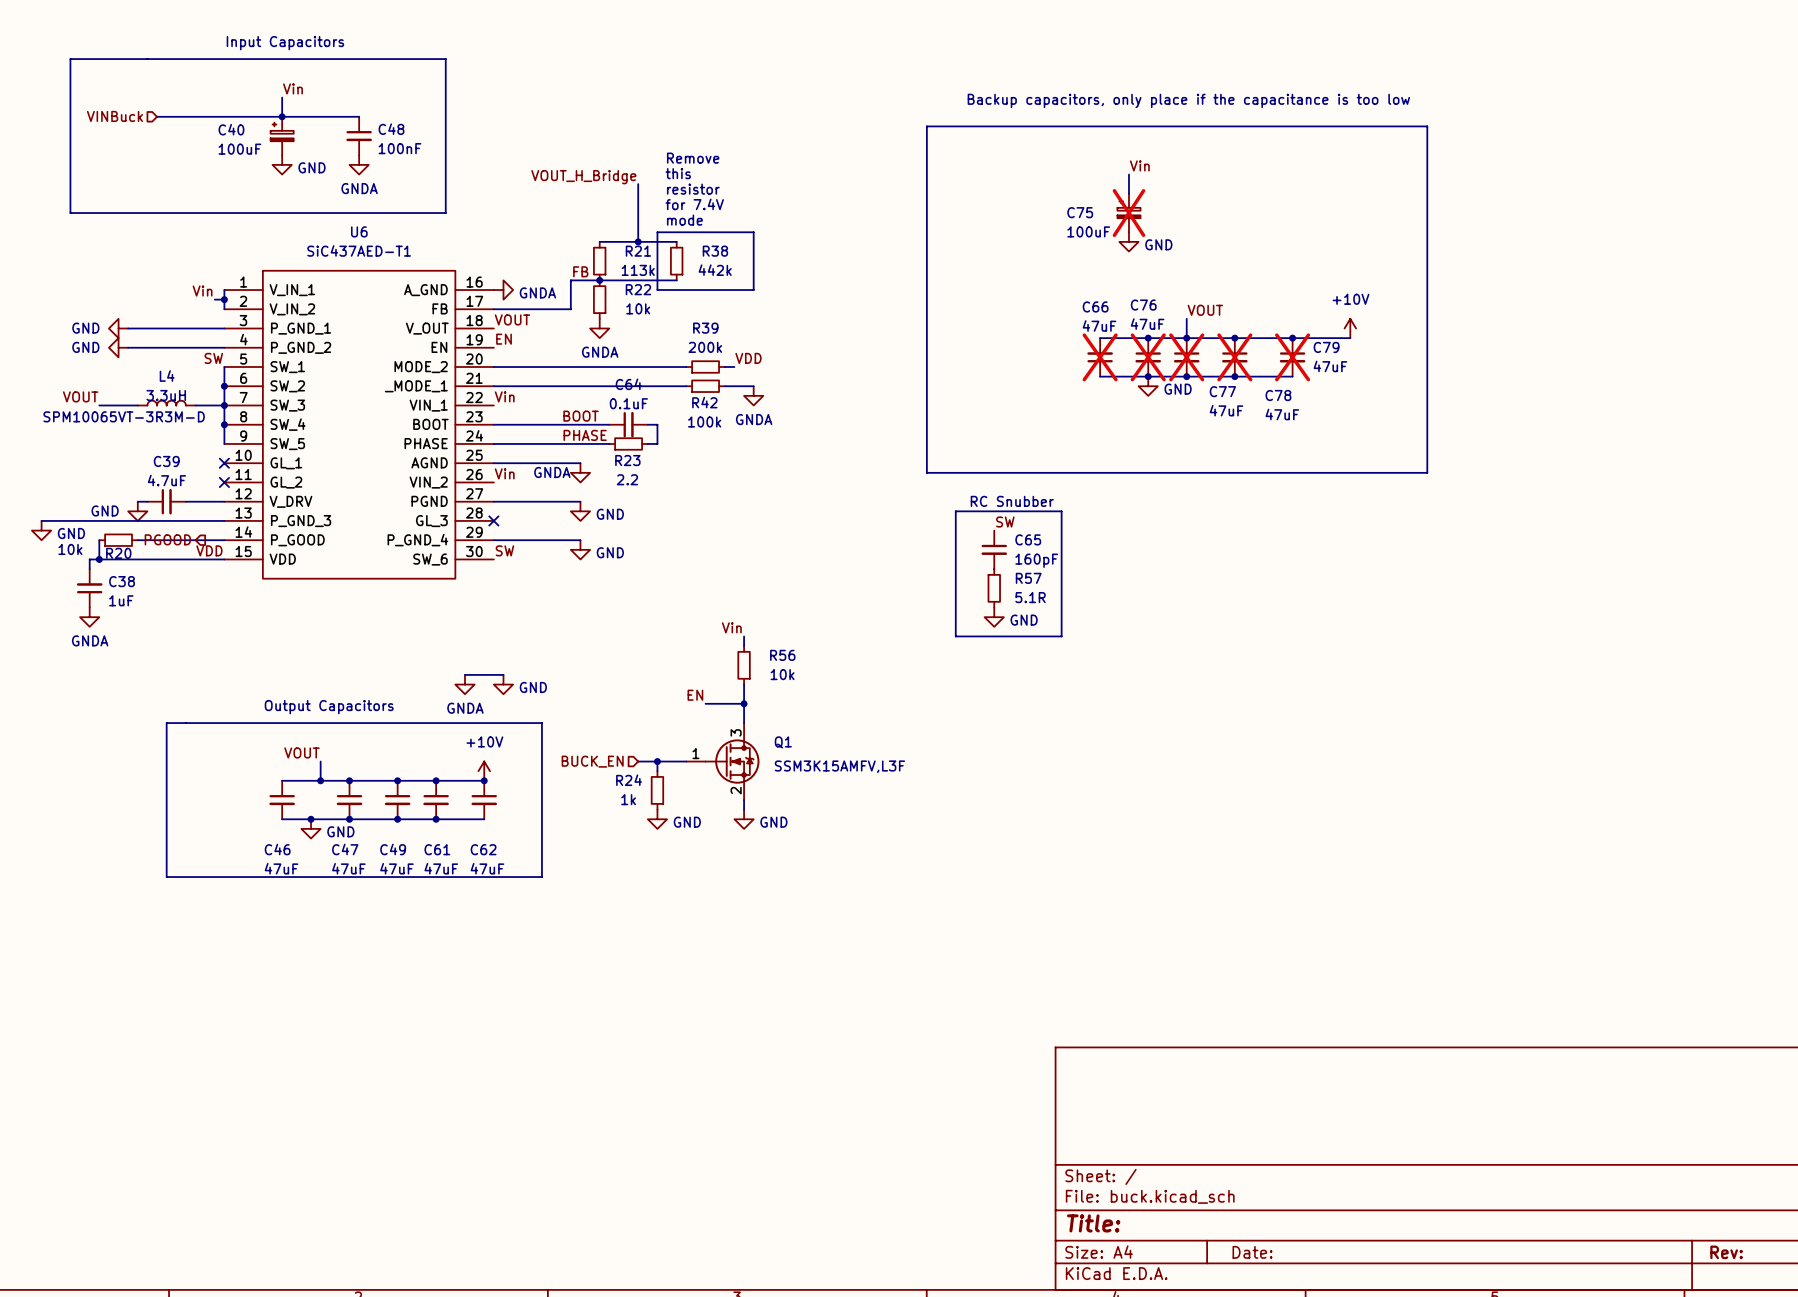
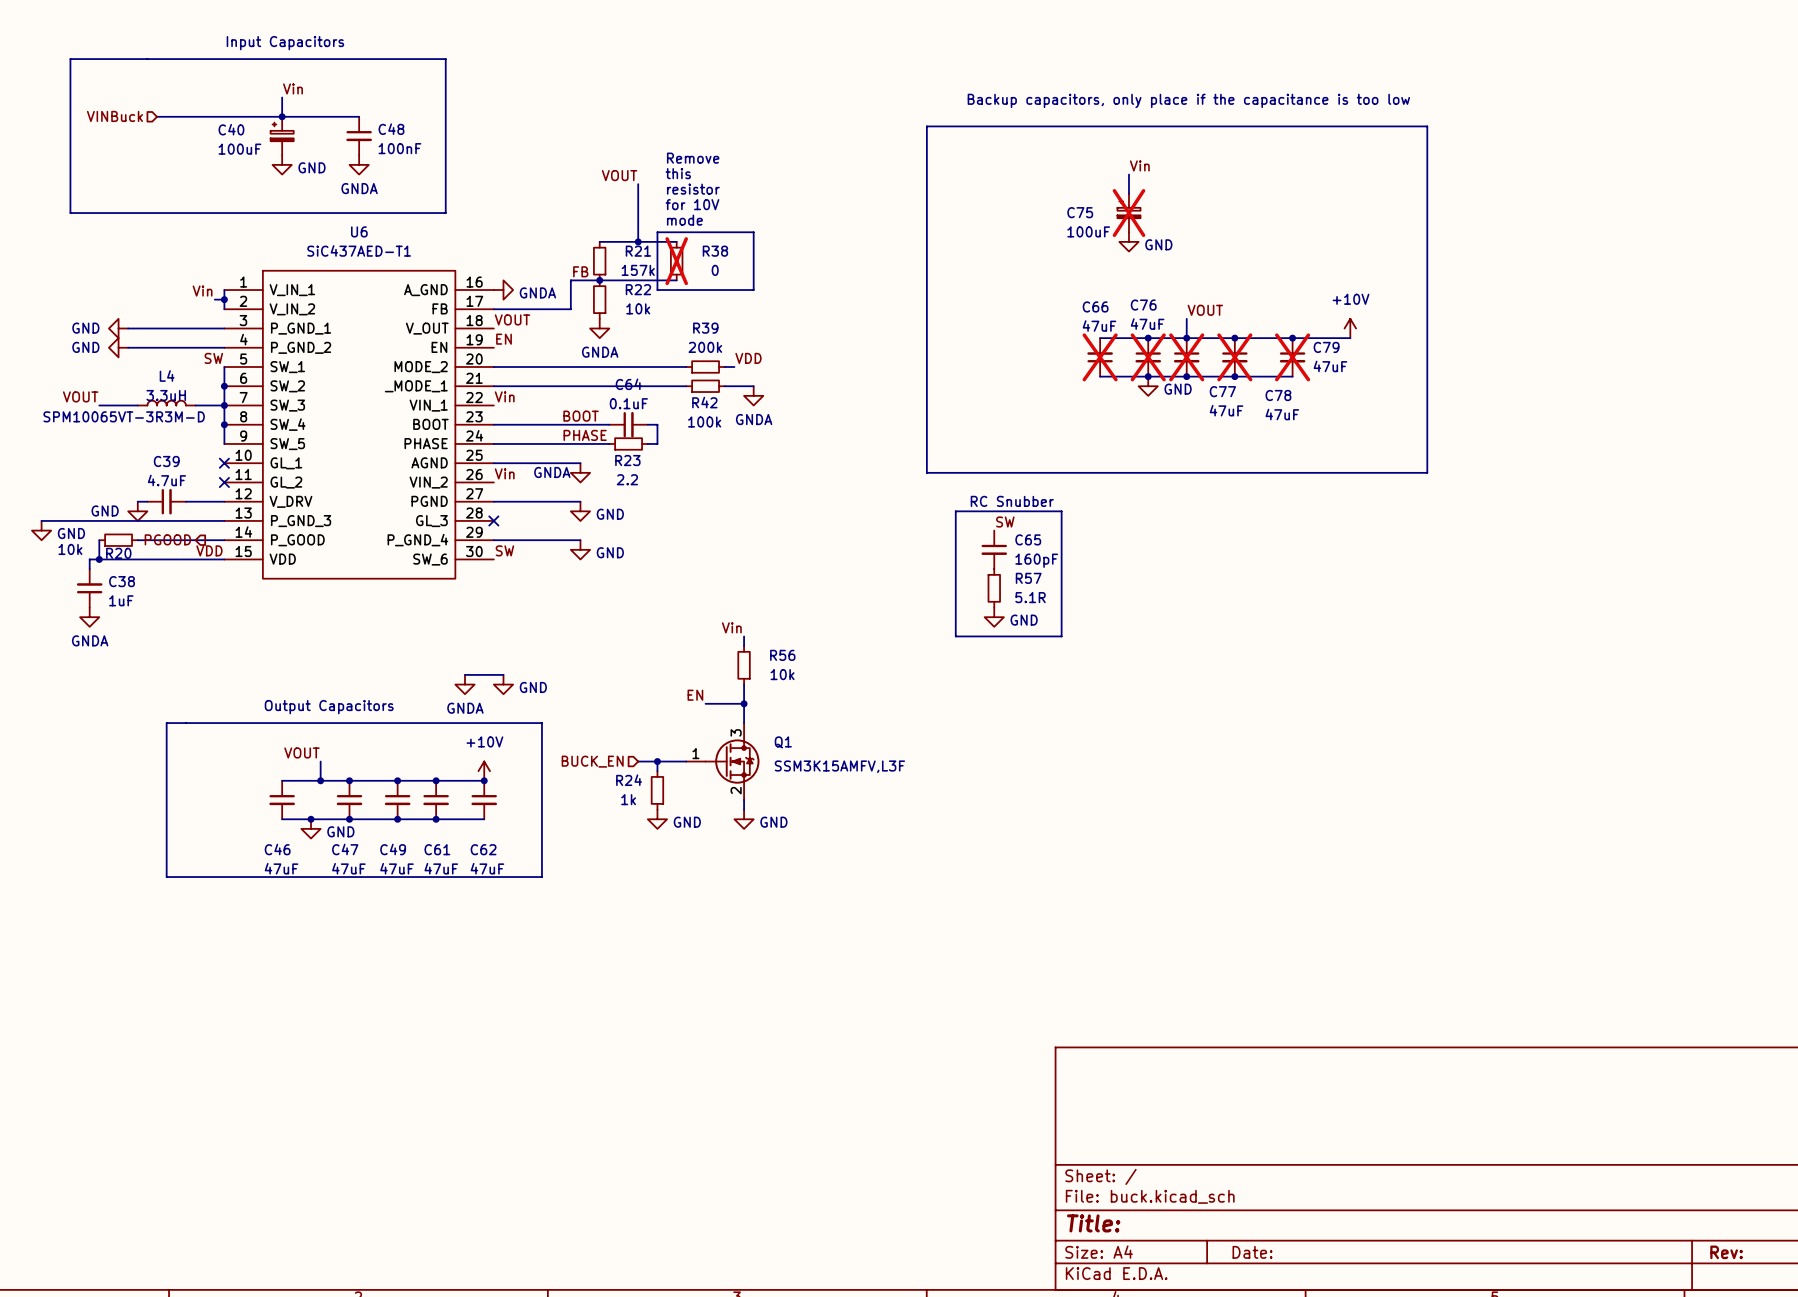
label: VOUT_H_Bridge (583, 177) -> VOUT (619, 175)
text: for 7.4V (694, 204) -> for 10V (692, 204)
R38 do-not-place cross: none -> (676, 261)
R21 value: 113k (638, 270) -> 157k (638, 270)
R38 value: 442k (715, 270) -> 0 (715, 270)

